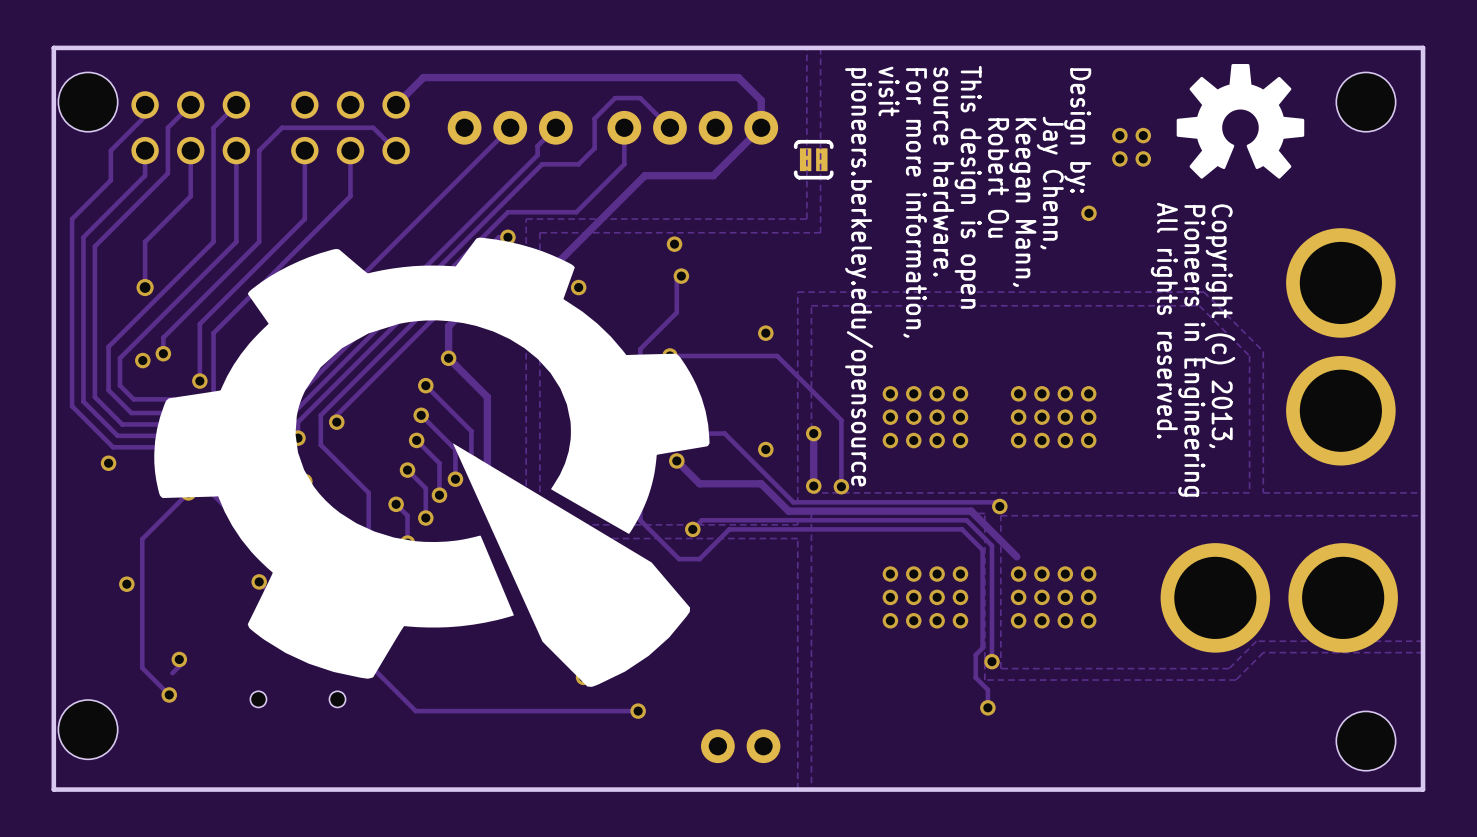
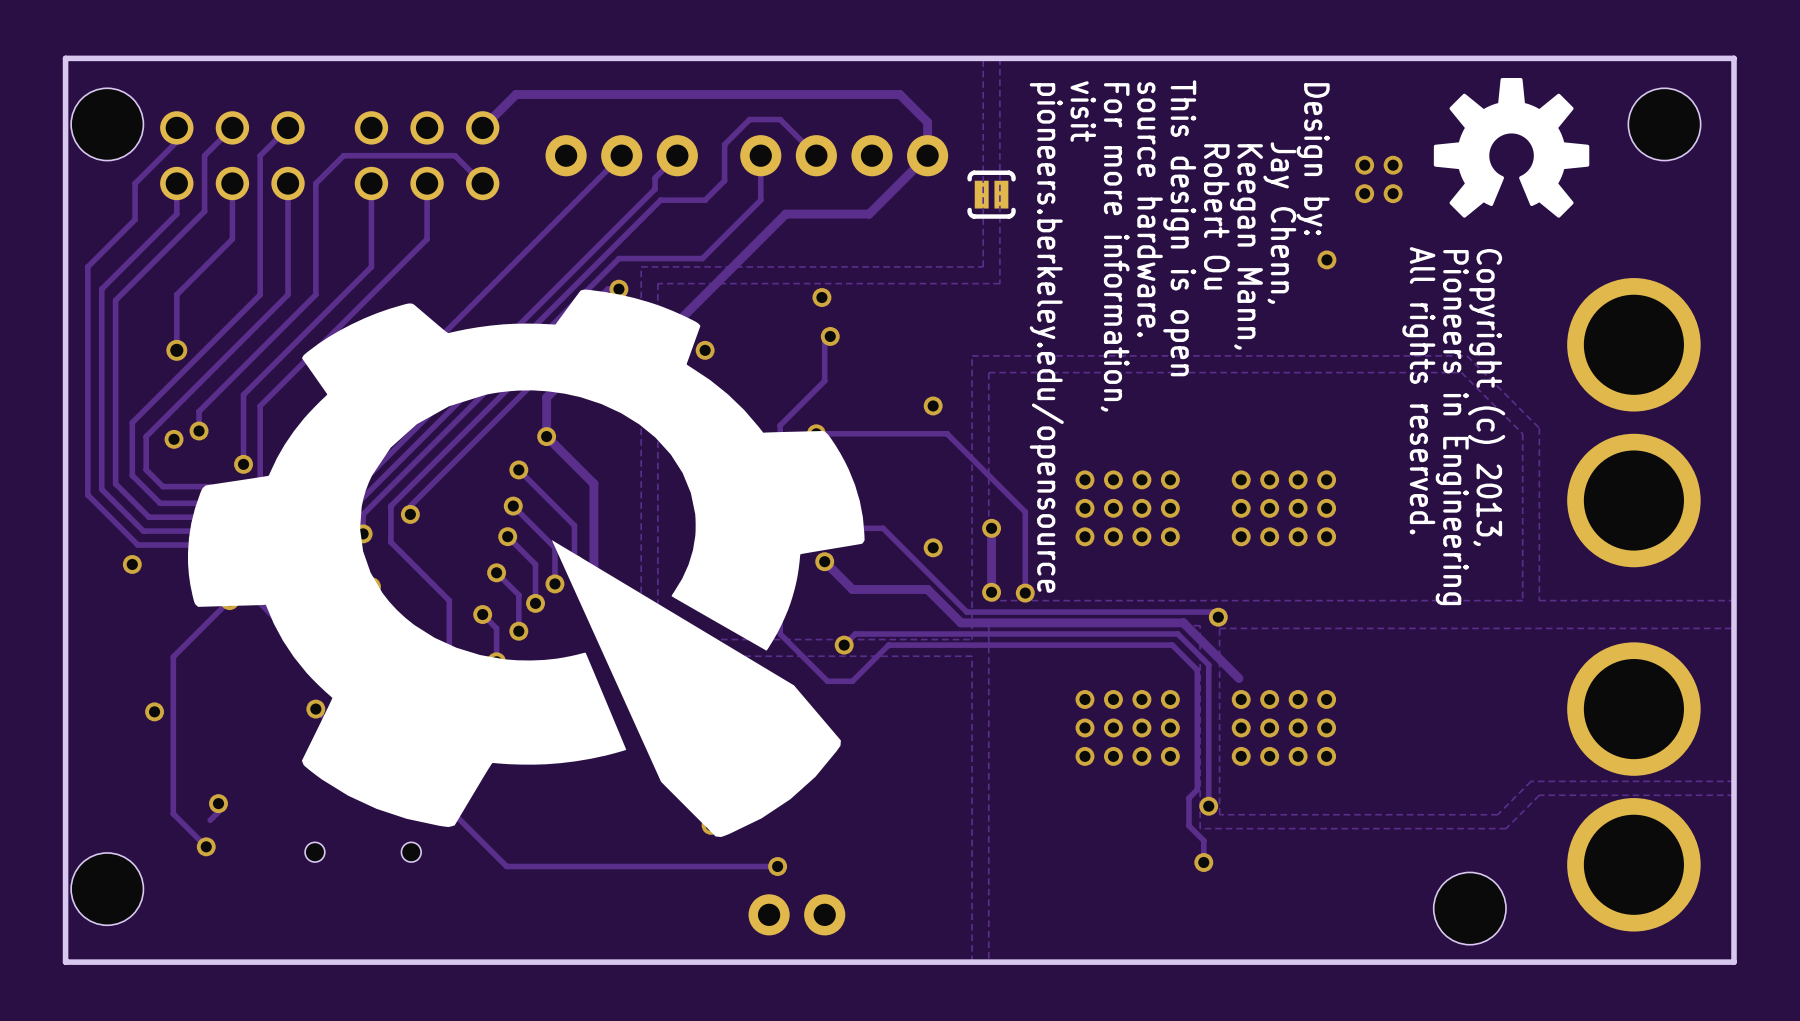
part rotation: 0° (1279, 597) -> 90° clockwise (1633, 786)
part position: (1365, 741) -> (1469, 908)
part position: (740, 746) -> (796, 914)

